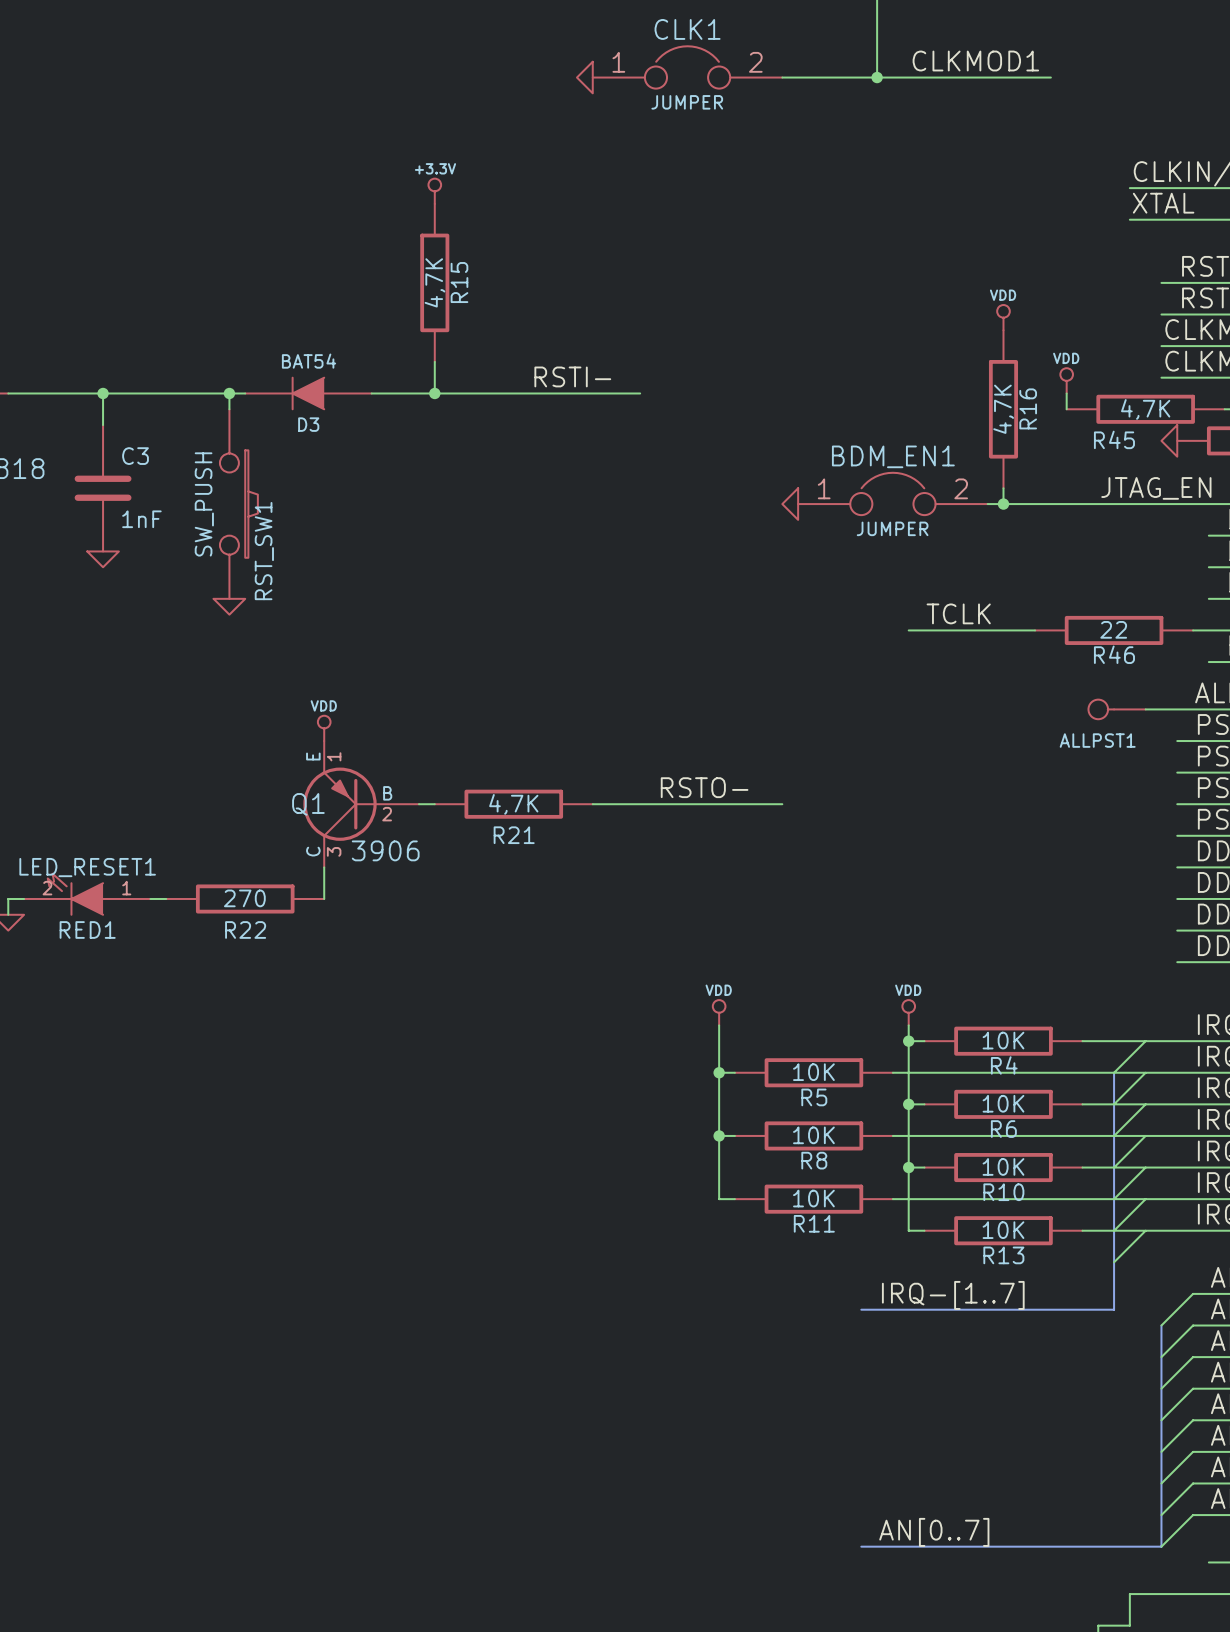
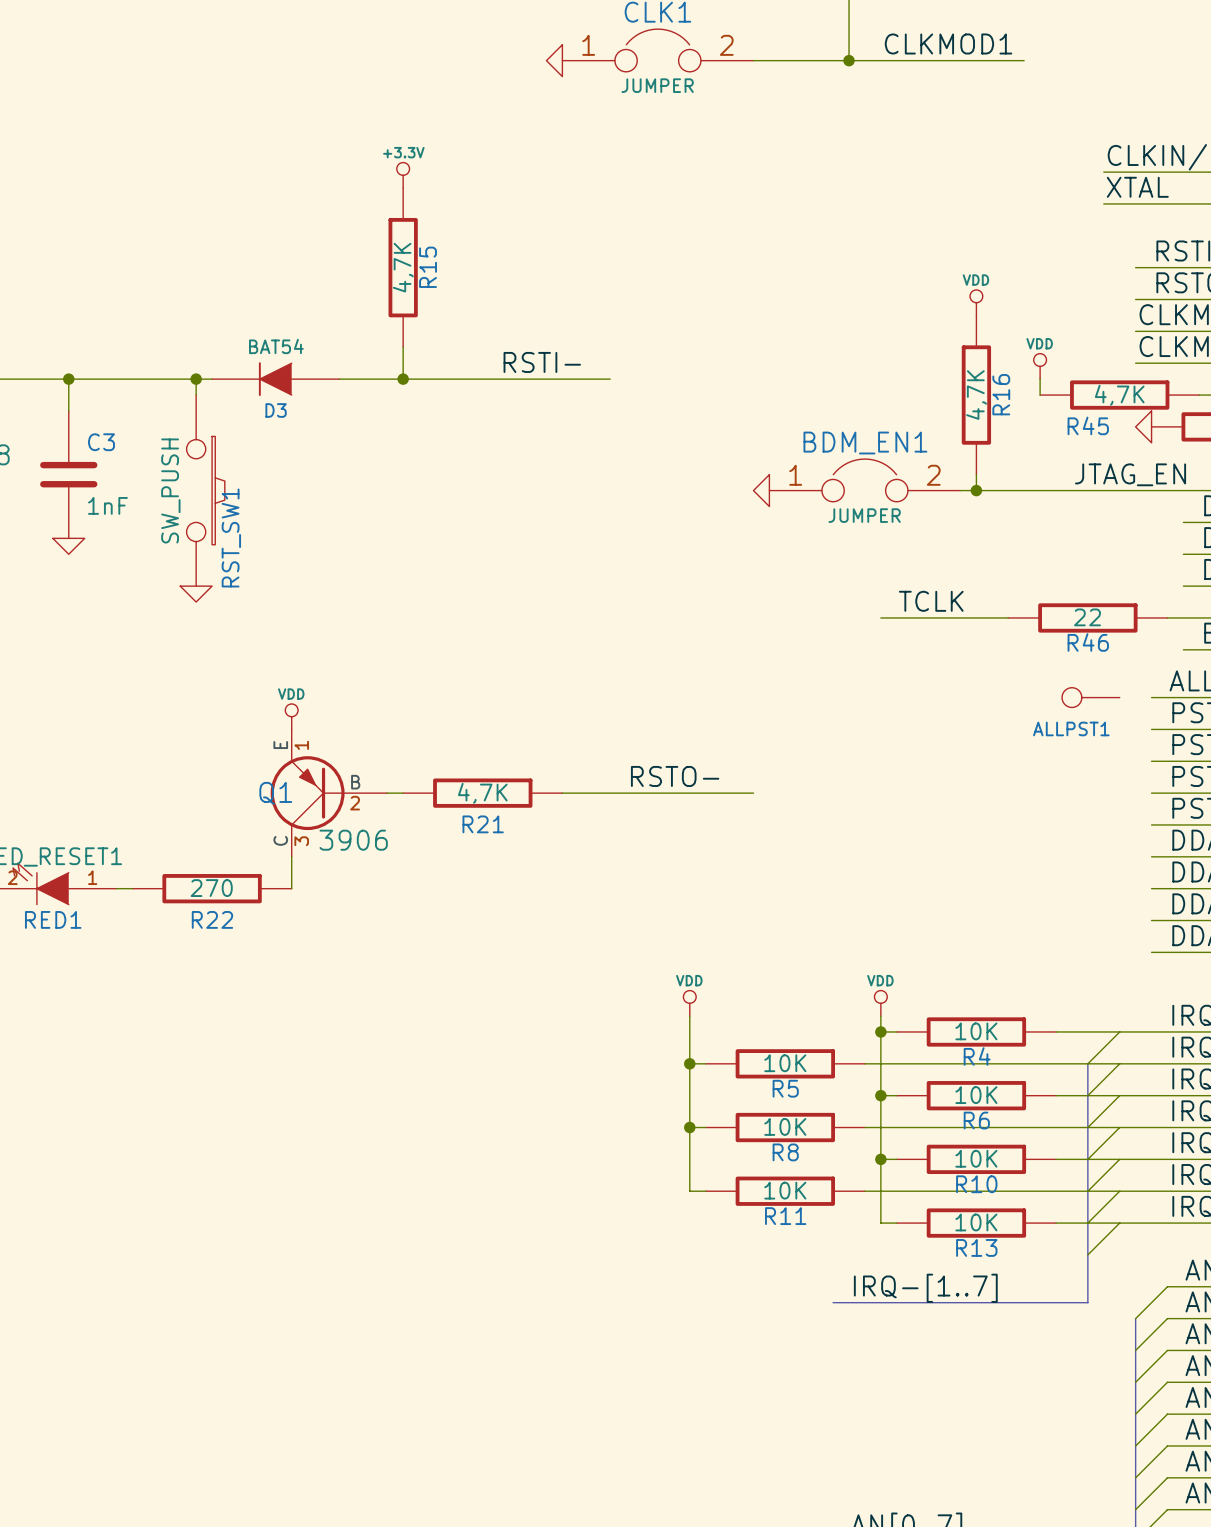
wire: (1145, 709) (1177, 709) -> none

